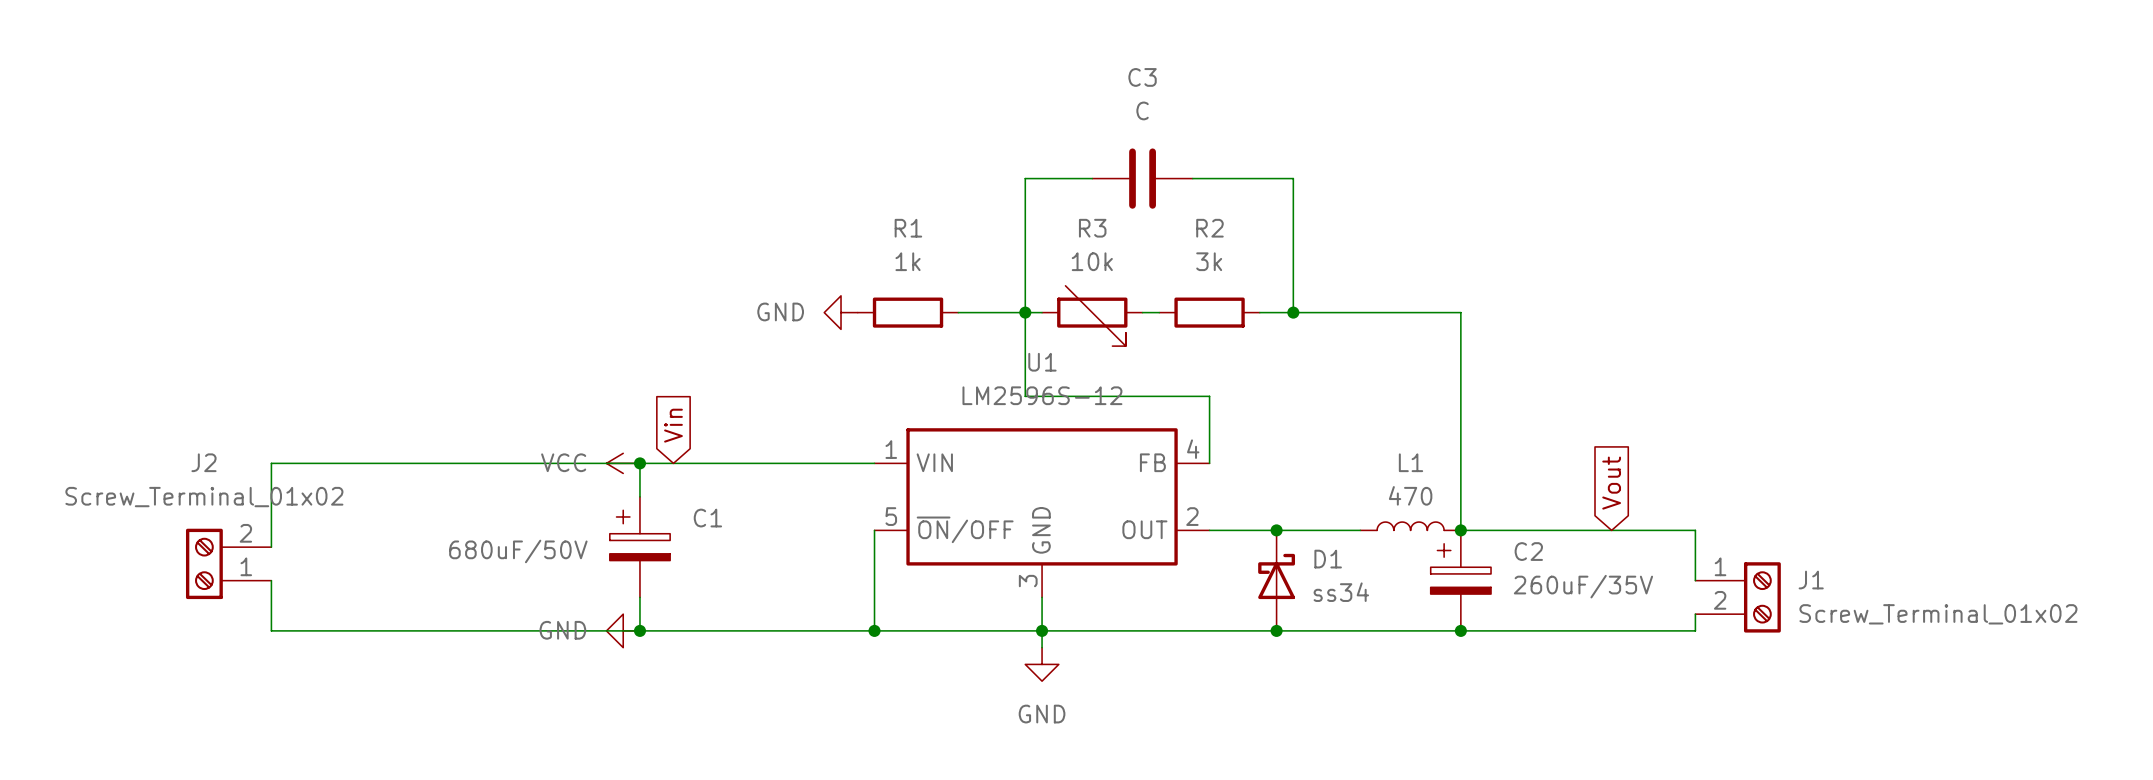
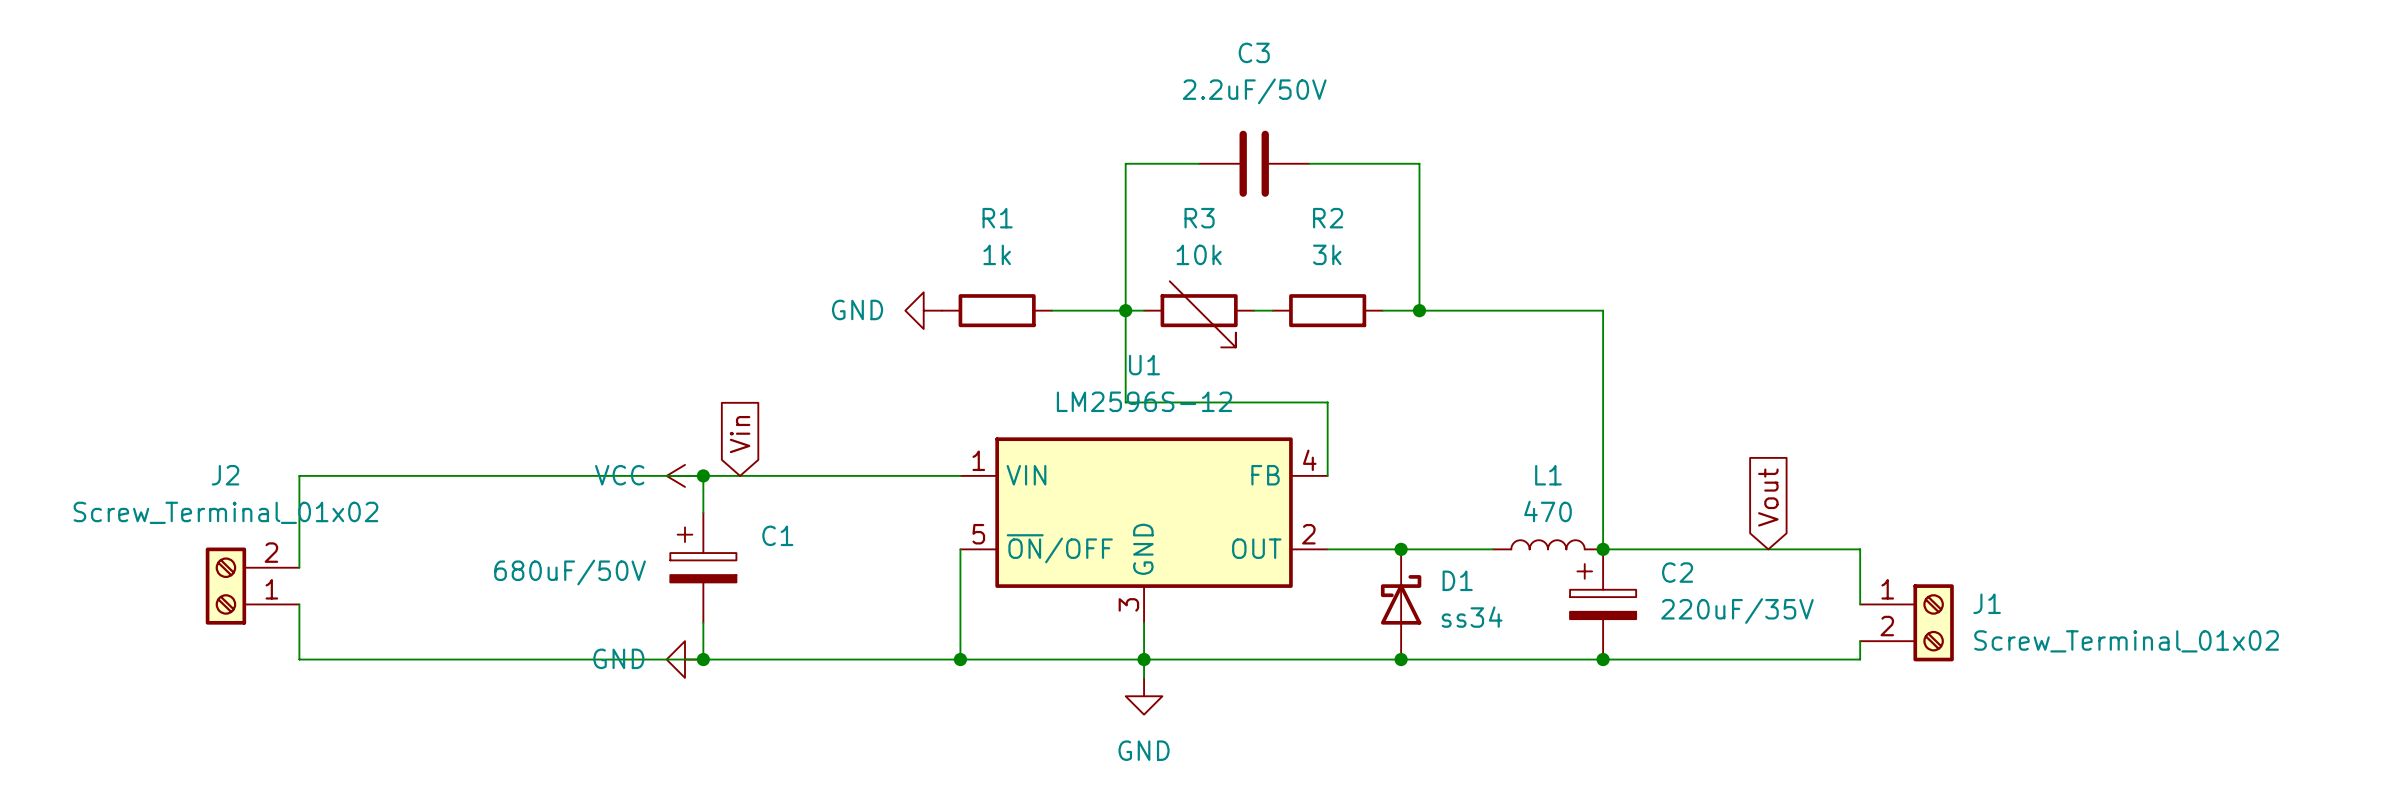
C3 value: C (1142, 110) -> 2.2uF/50V (1254, 91)
C2 value: 260uF/35V (1583, 586) -> 220uF/35V (1737, 611)

